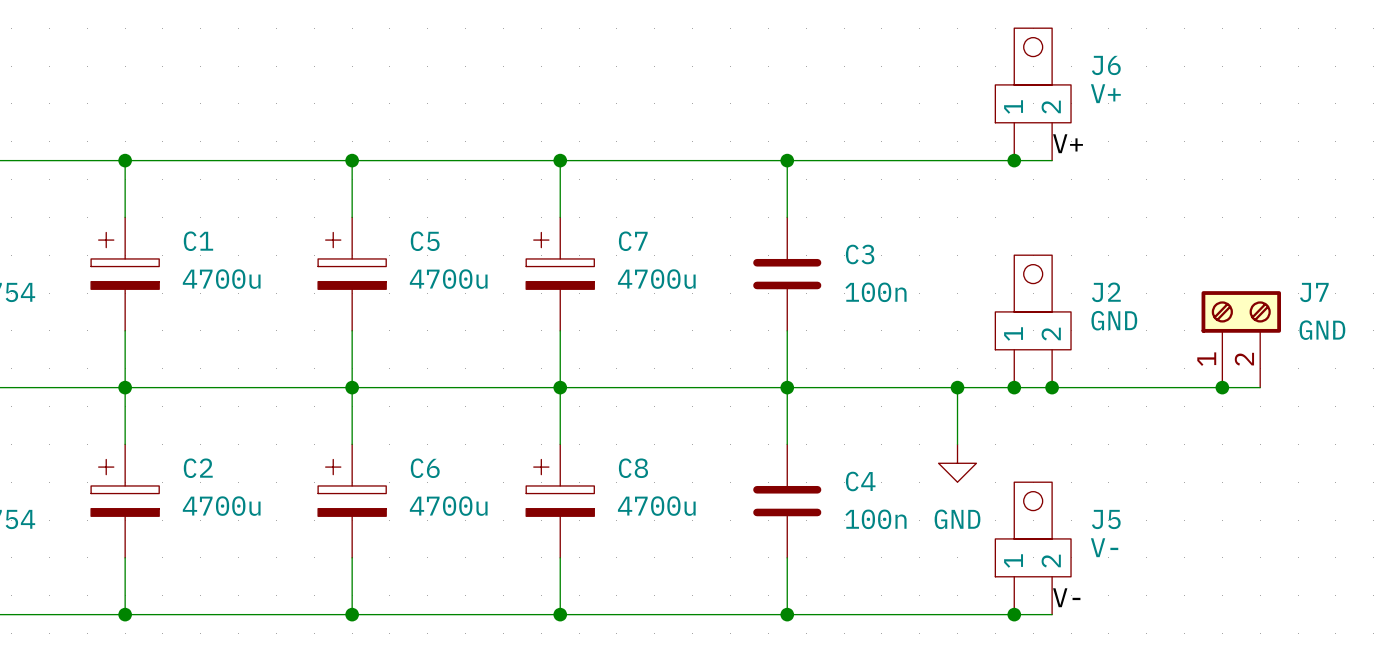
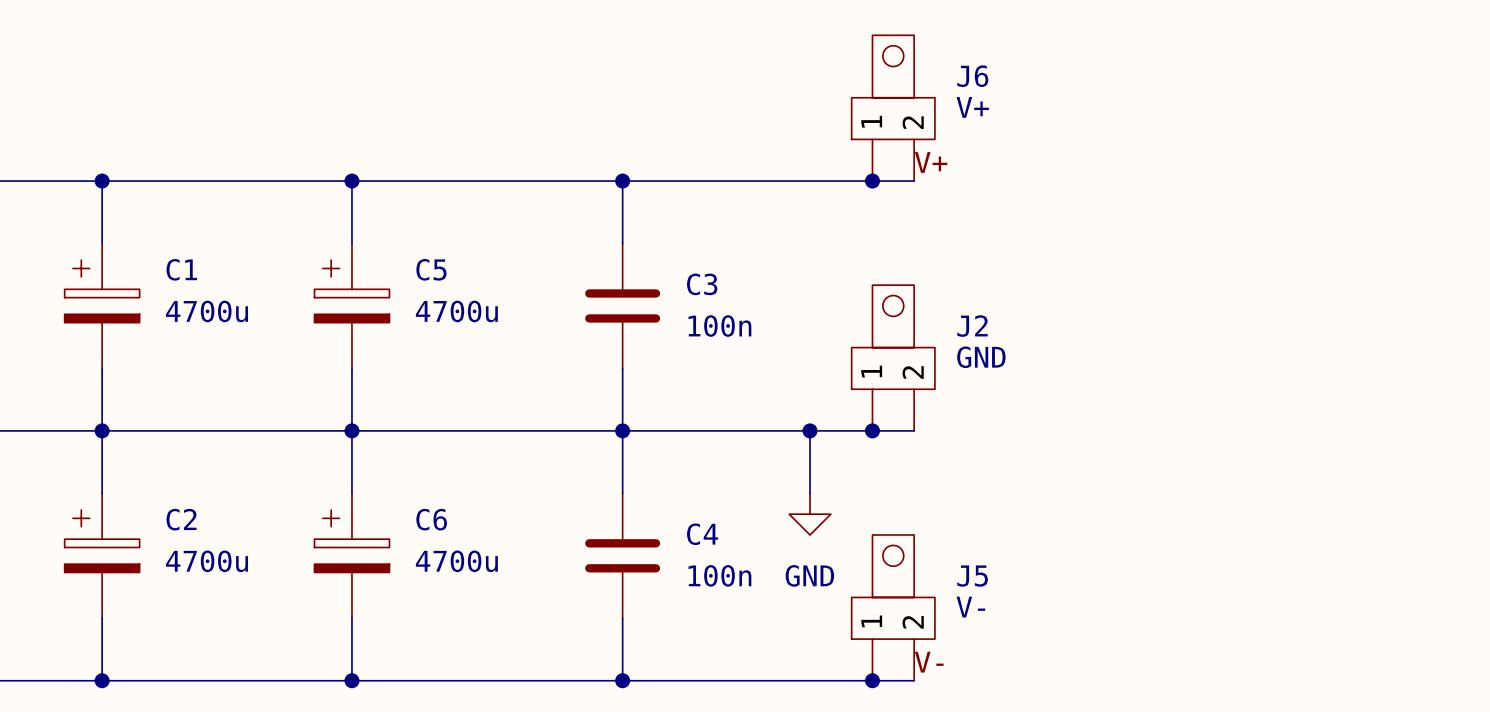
J6 position: (1033, 94) -> (893, 108)
label position: V+ (1068, 143) -> V+ (931, 162)
wire: (560, 160) (560, 217) -> none
junction position: (560, 160) -> (622, 181)
wire: (787, 160) (787, 217) -> (622, 181) (622, 243)
junction position: (787, 160) -> (872, 181)
wire: (862, 160) (1052, 160) -> none
junction: (1014, 160) -> none
C7: 4700u (560, 274) -> none
C3 position: (787, 274) -> (622, 305)
J2 position: (1033, 321) -> (893, 358)
wire: (560, 330) (560, 444) -> none
wire: (787, 330) (787, 444) -> (622, 368) (622, 493)
J7: GND (1241, 339) -> none
junction position: (560, 387) -> (622, 430)
junction: none -> (810, 430)
junction: (787, 387) -> none
junction: none -> (872, 430)
wire: (862, 387) (1260, 387) -> none
wire: (957, 387) (957, 444) -> (810, 430) (810, 493)
junction: (957, 387) -> none
junction: (1014, 387) -> none
junction: (1052, 387) -> none
junction: (1222, 387) -> none
power symbol position: GND (957, 463) -> GND (810, 514)
C8: 4700u (560, 501) -> none
C4 position: (787, 501) -> (622, 555)
J5 position: (1033, 548) -> (893, 607)
wire: (560, 557) (560, 614) -> none
wire: (787, 557) (787, 614) -> (622, 618) (622, 680)
label position: V- (1066, 597) -> V- (929, 662)
junction position: (560, 614) -> (622, 680)
junction position: (787, 614) -> (872, 680)
wire: (862, 614) (1052, 614) -> none
junction: (1014, 614) -> none

